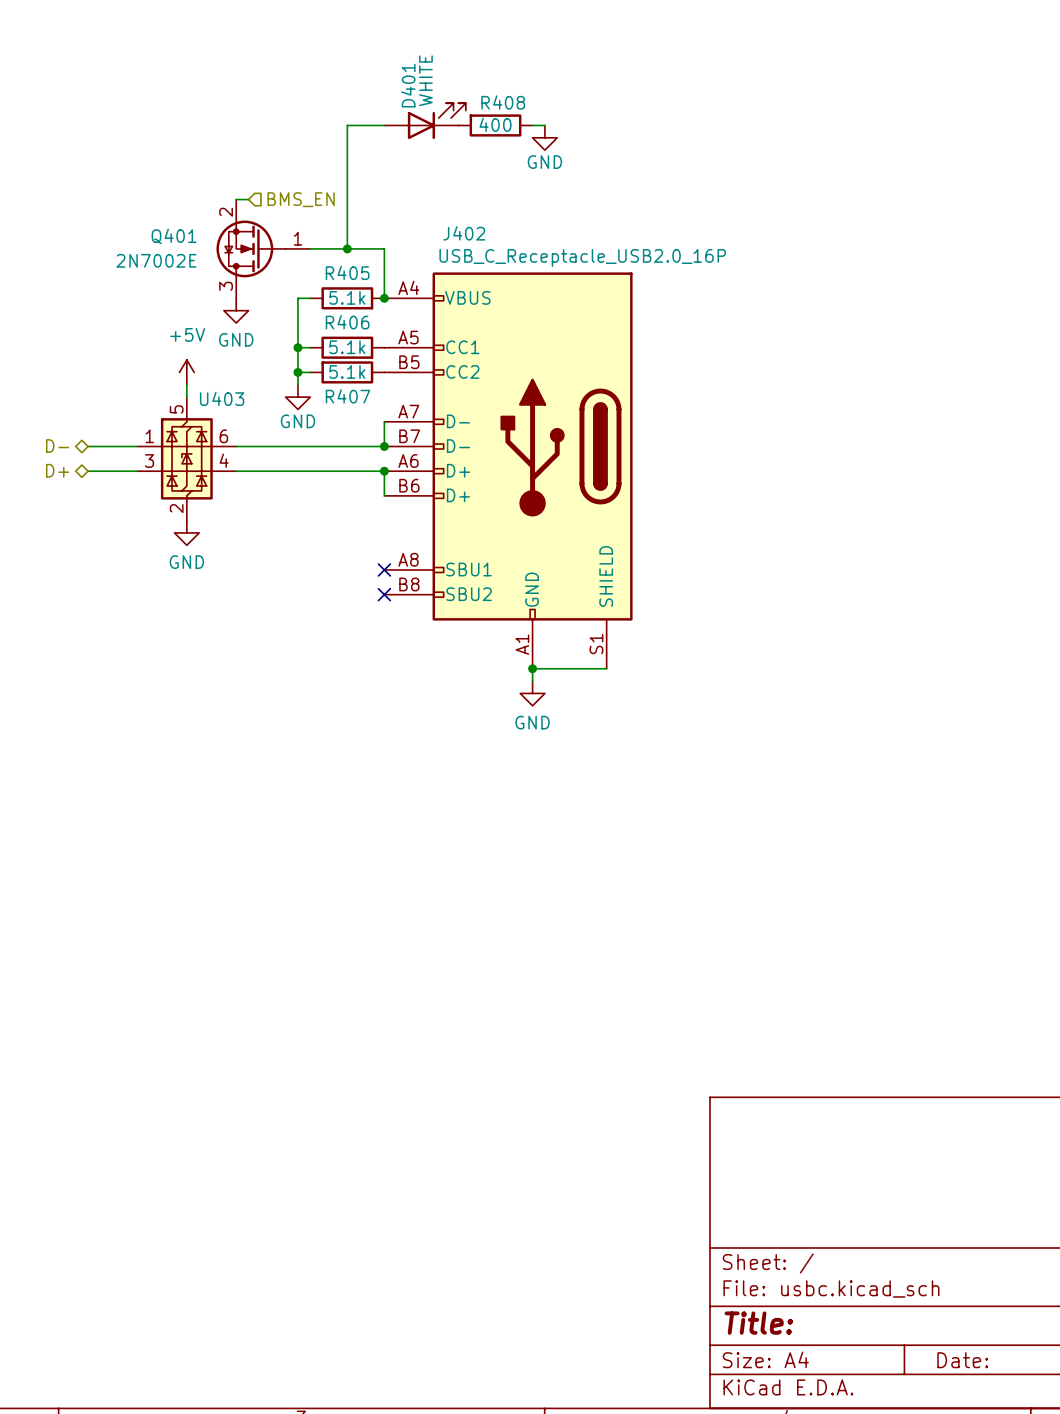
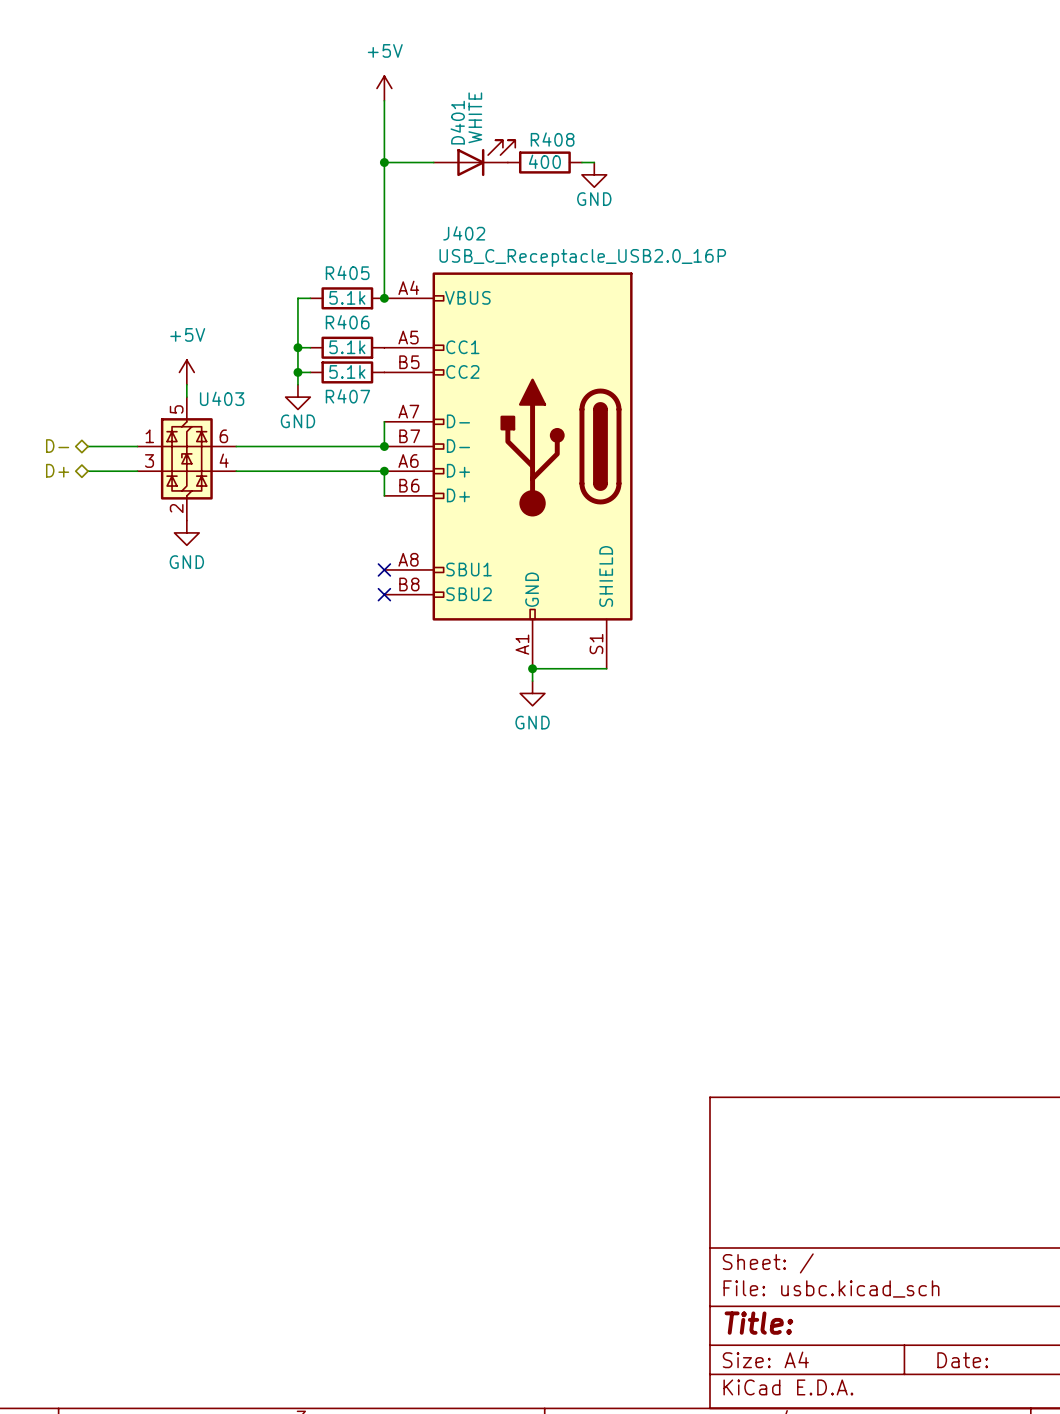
power symbol: none -> +5V (384, 88)
D401 position: (425, 121) -> (474, 158)
wire: (384, 125) (347, 125) (347, 248) -> none
R408 position: (495, 125) -> (544, 162)
wire: (532, 125) (544, 125) -> (581, 162) (594, 162)
power symbol position: GND (544, 137) -> GND (594, 174)
wire: none -> (384, 162) (433, 162)
junction: none -> (384, 162)
wire: (236, 199) (248, 199) -> none
hierarchical label: BMS_EN (301, 199) -> none
Q401: 2N7002E (263, 248) -> none
wire: (310, 248) (384, 248) -> (384, 100) (384, 248)
junction: (347, 248) -> none
power symbol: GND (236, 310) -> none

